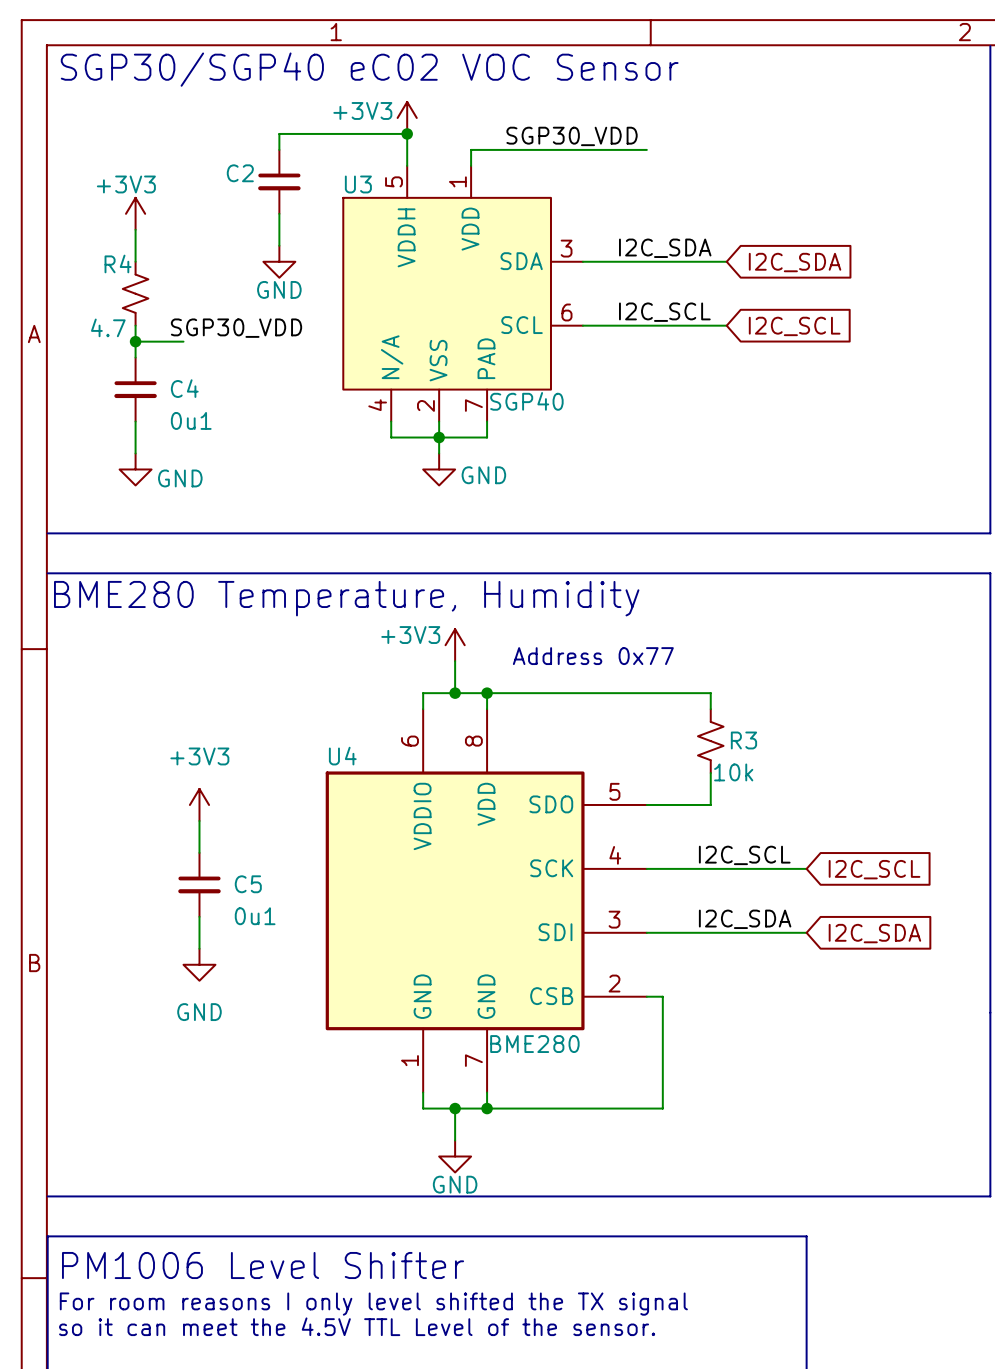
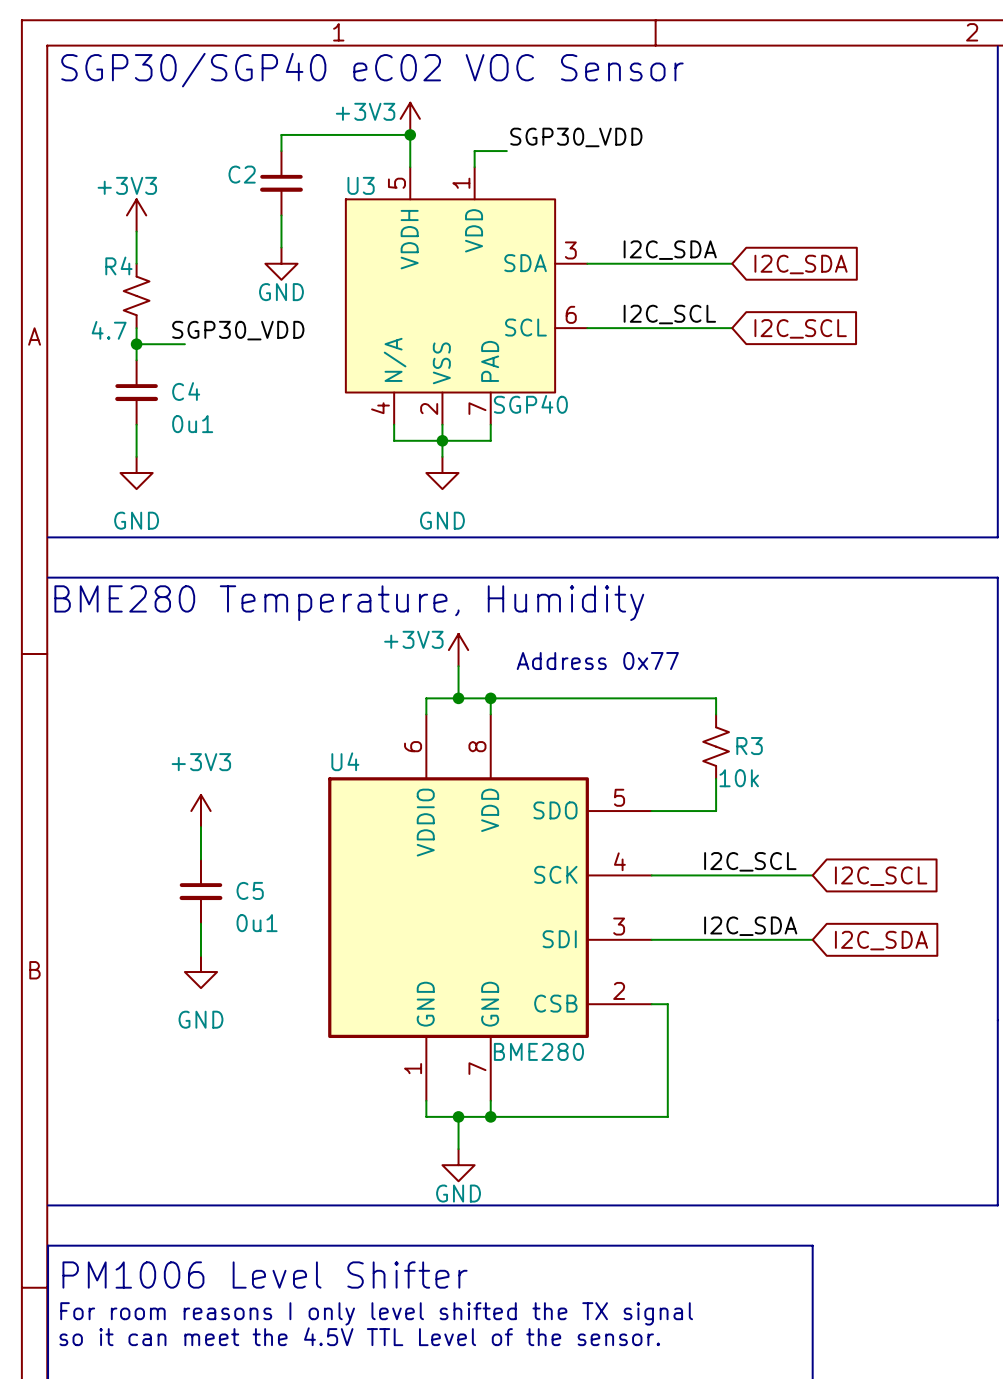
wire: (503, 149) (646, 149) -> none
power symbol text position: GND (483, 475) -> GND (442, 520)
power symbol text position: GND (180, 478) -> GND (136, 520)

